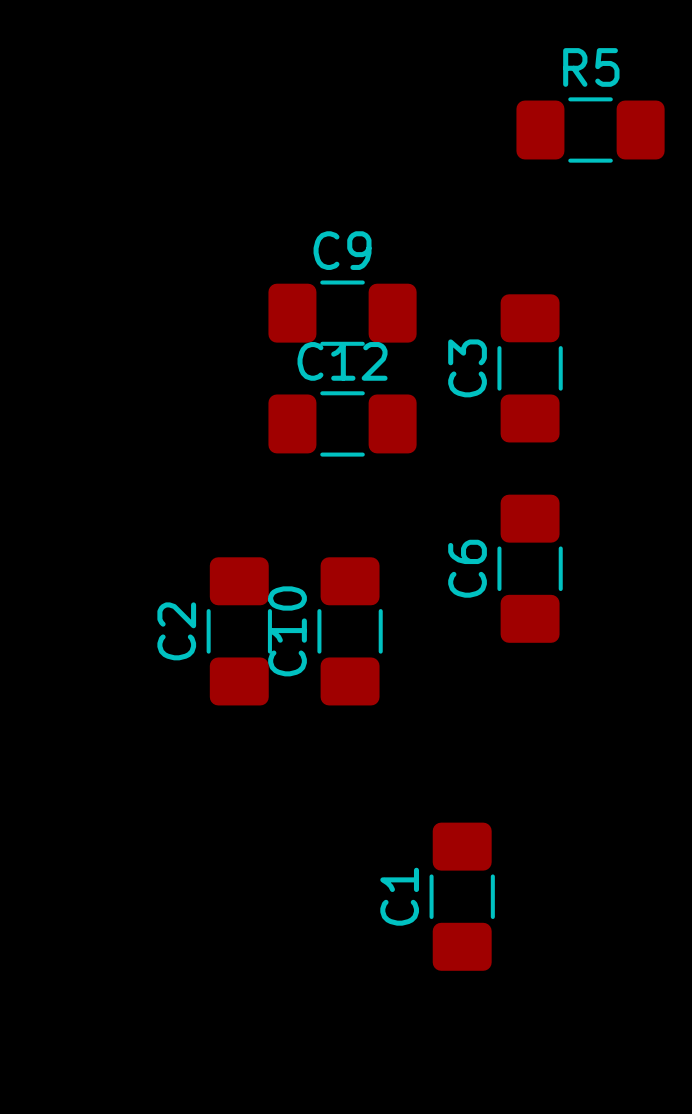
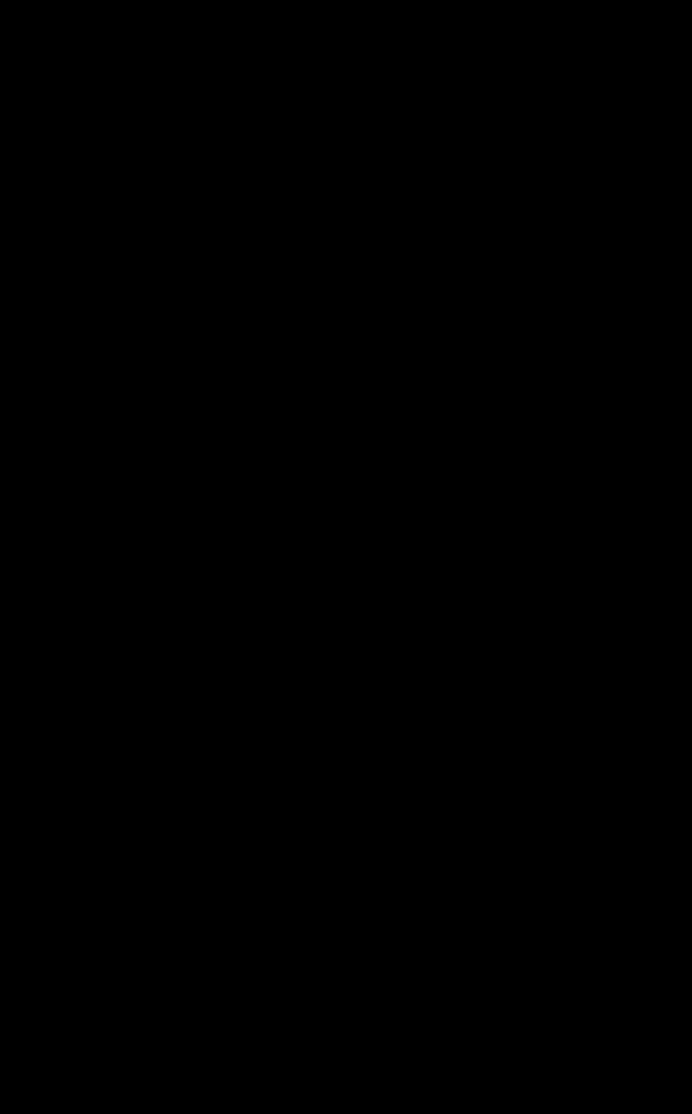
R5: (590, 130) -> none
C9: (342, 313) -> none
C3: (530, 368) -> none
C12: (342, 423) -> none
C6: (530, 568) -> none
C2: (239, 631) -> none
C10: (350, 631) -> none
C1: (462, 896) -> none

